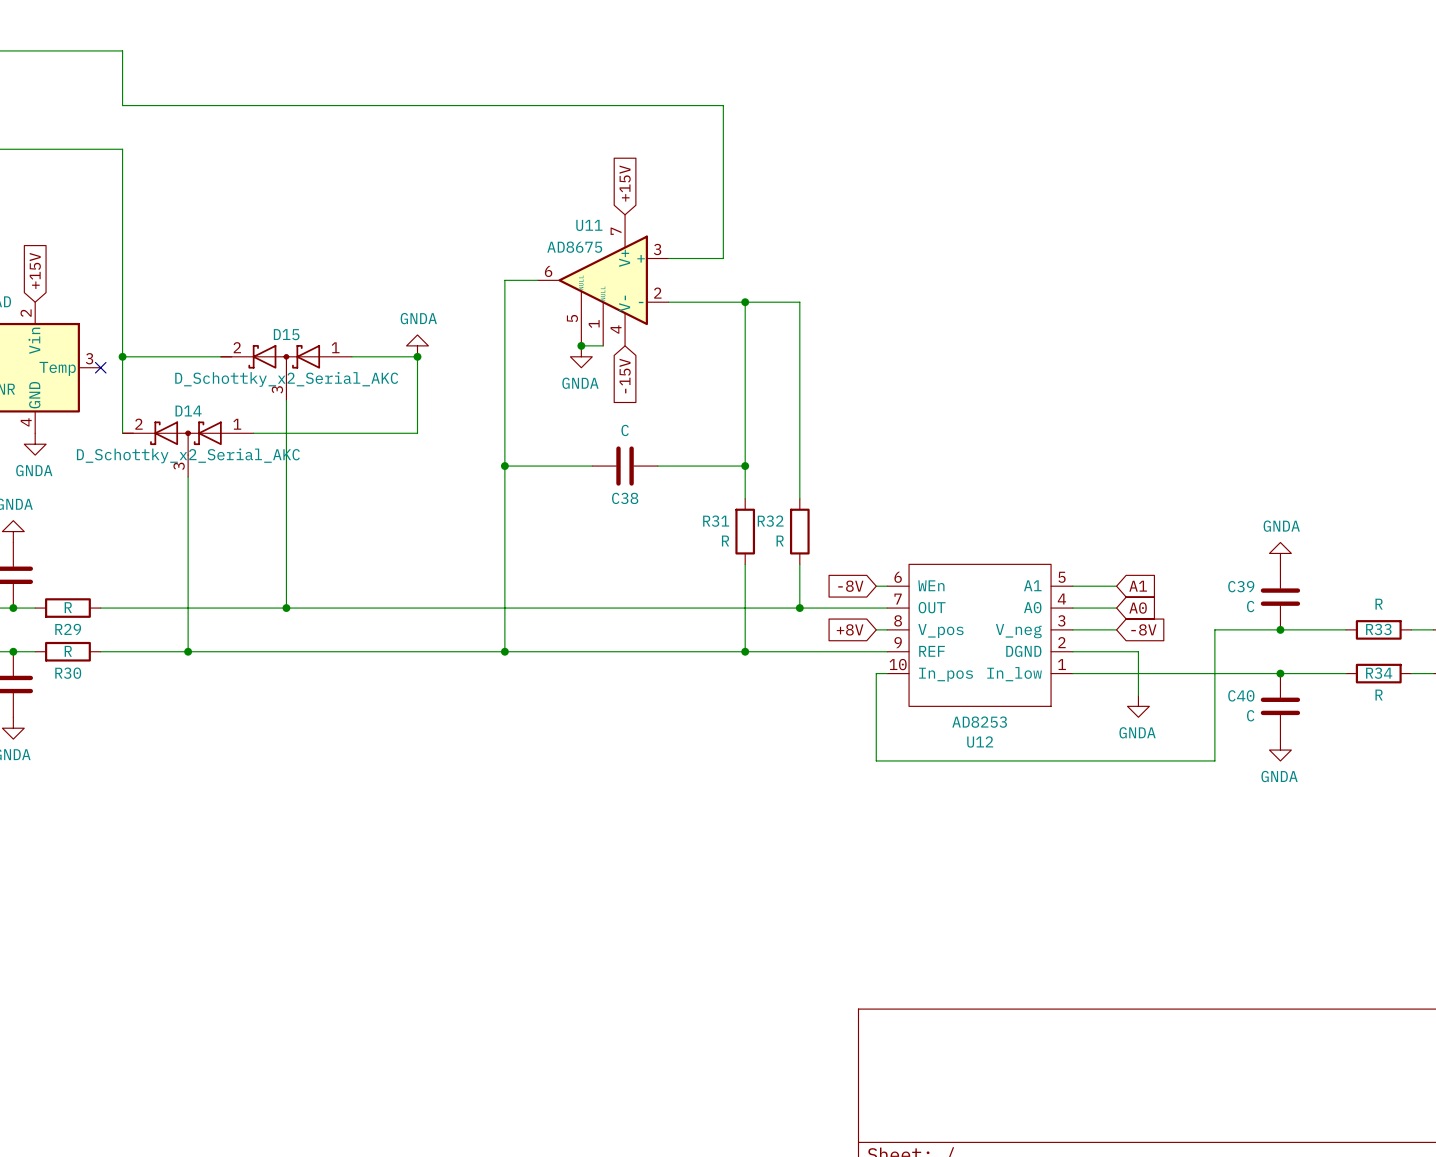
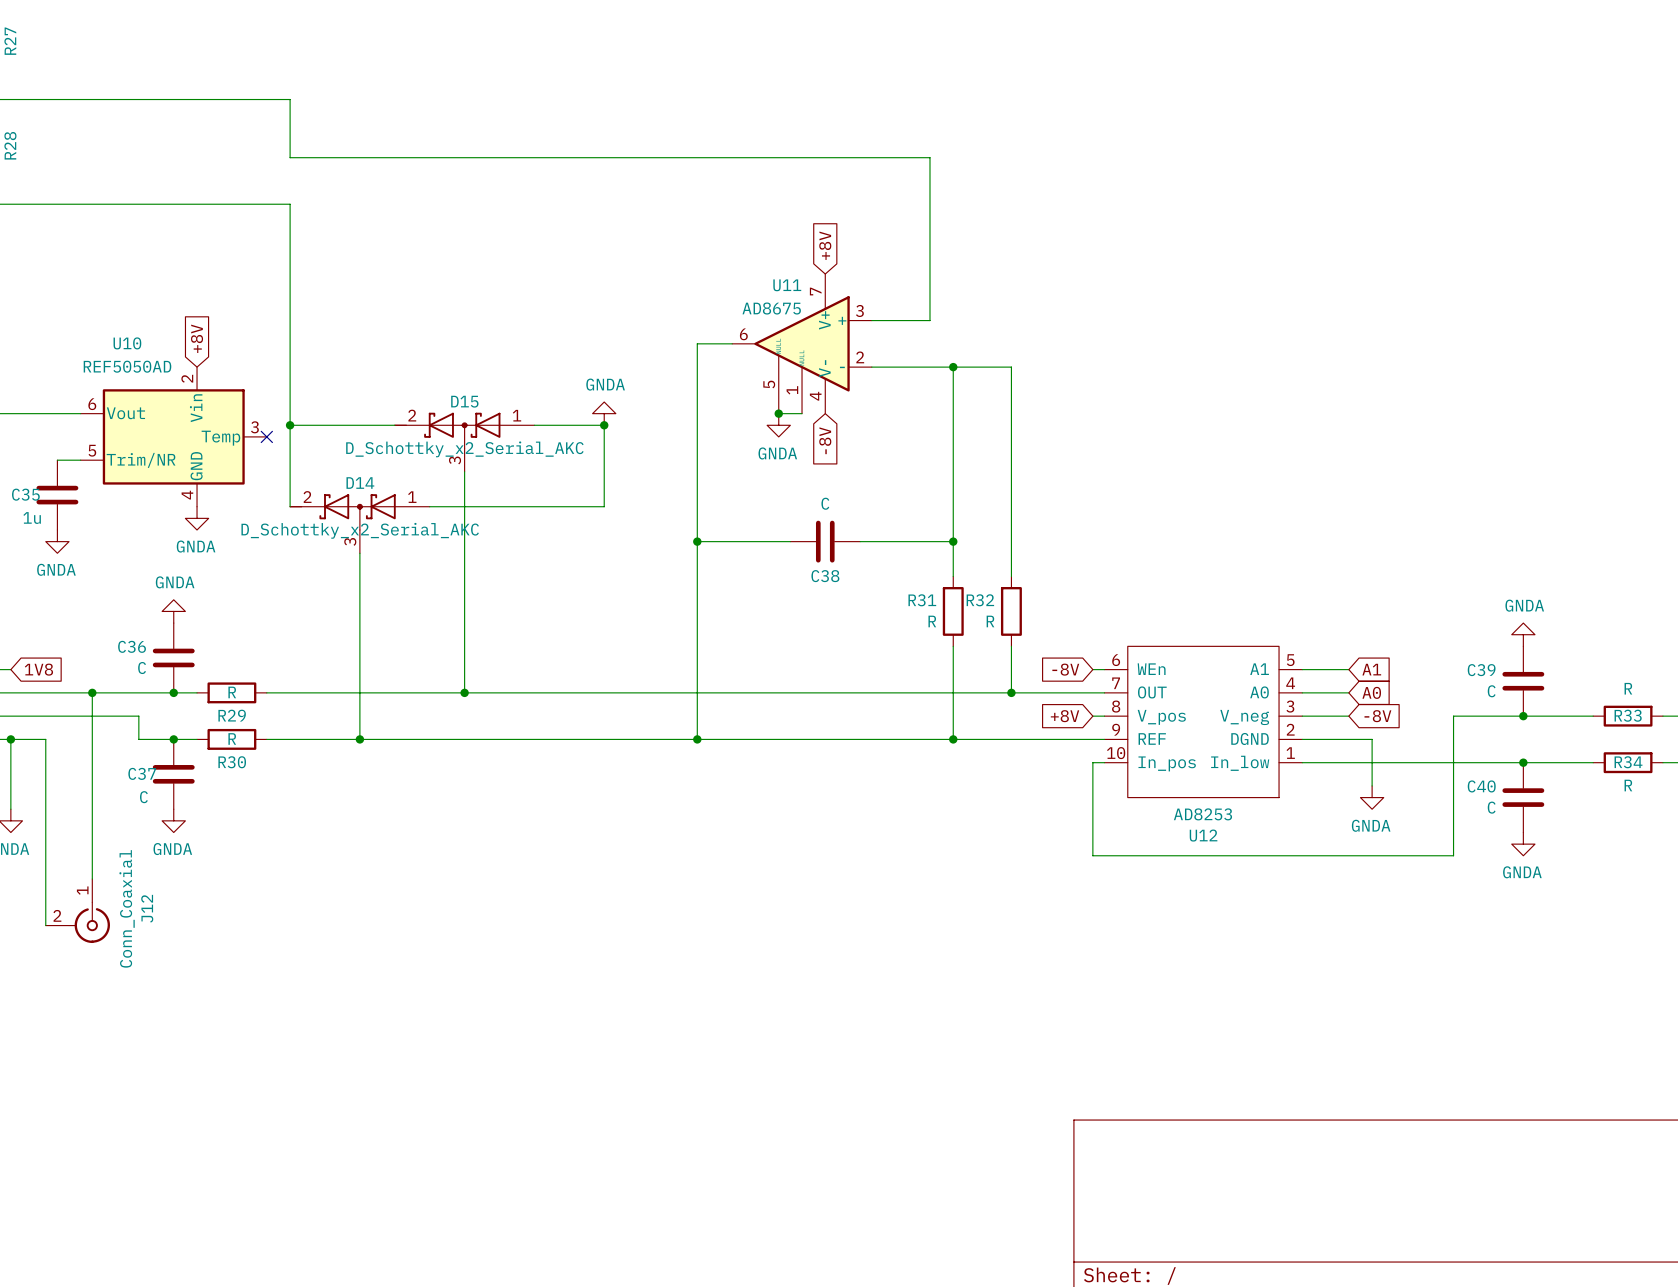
global label: +15V (625, 183) -> +8V (825, 245)
global label: +15V (35, 270) -> +8V (197, 338)
global label: -15V (625, 376) -> -8V (825, 440)

